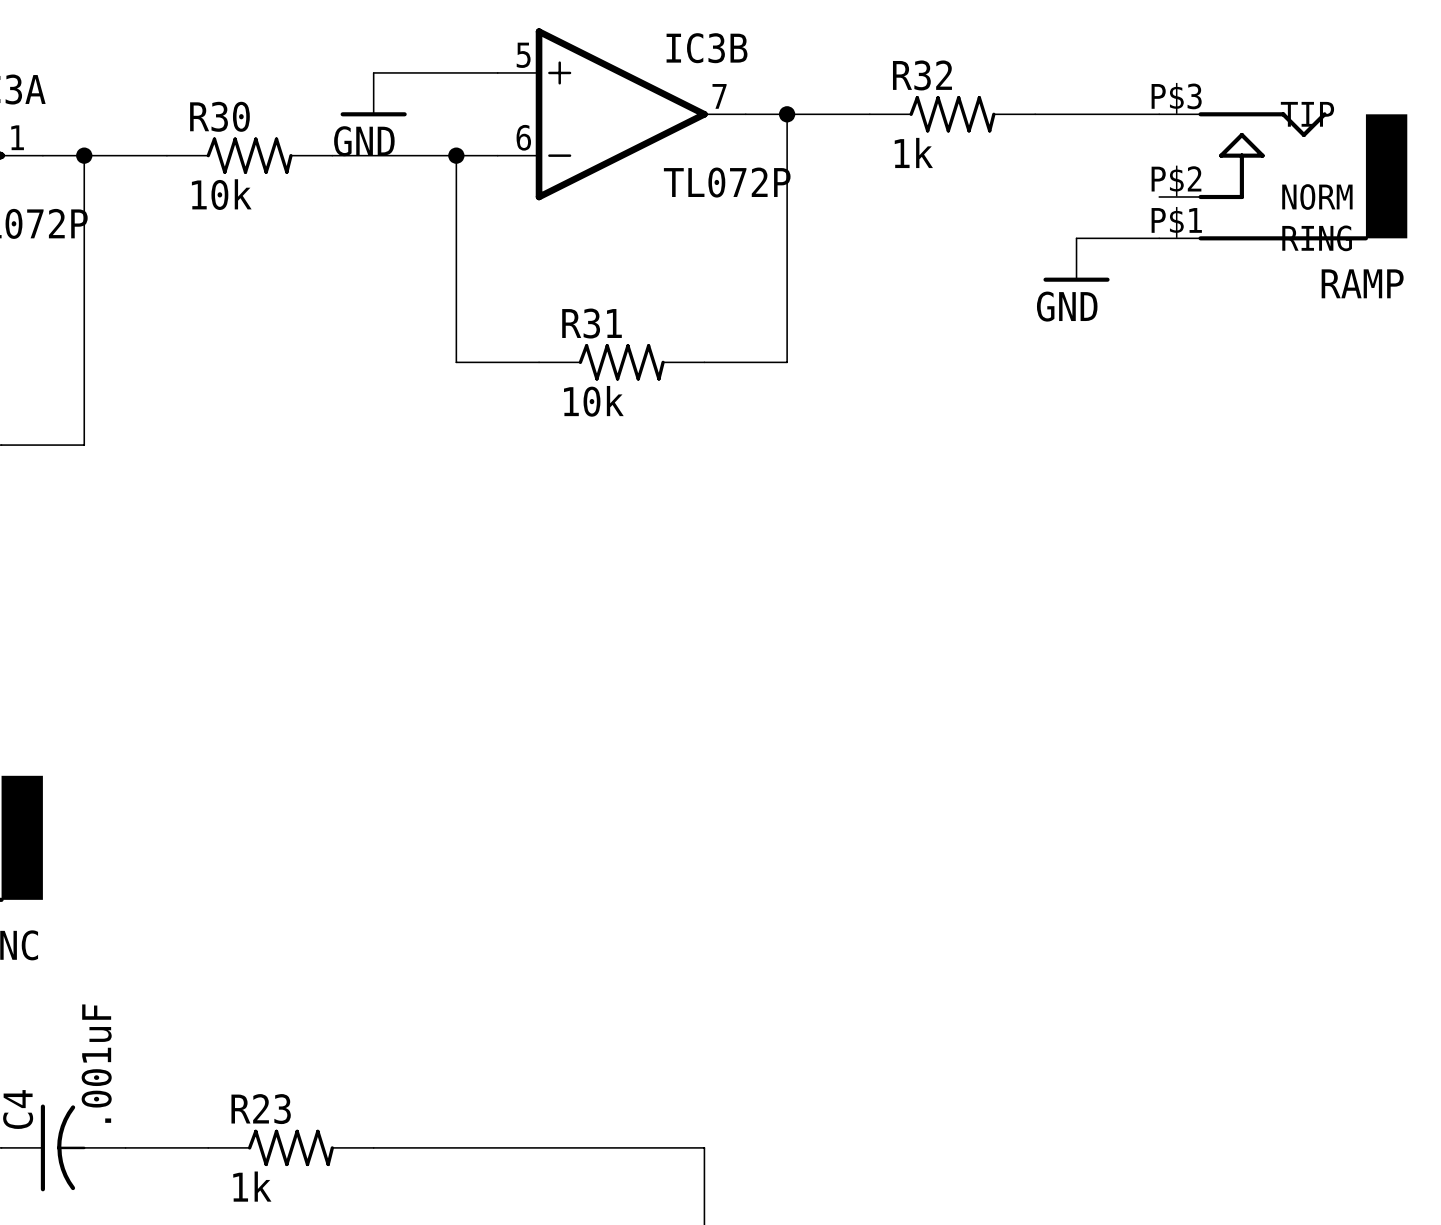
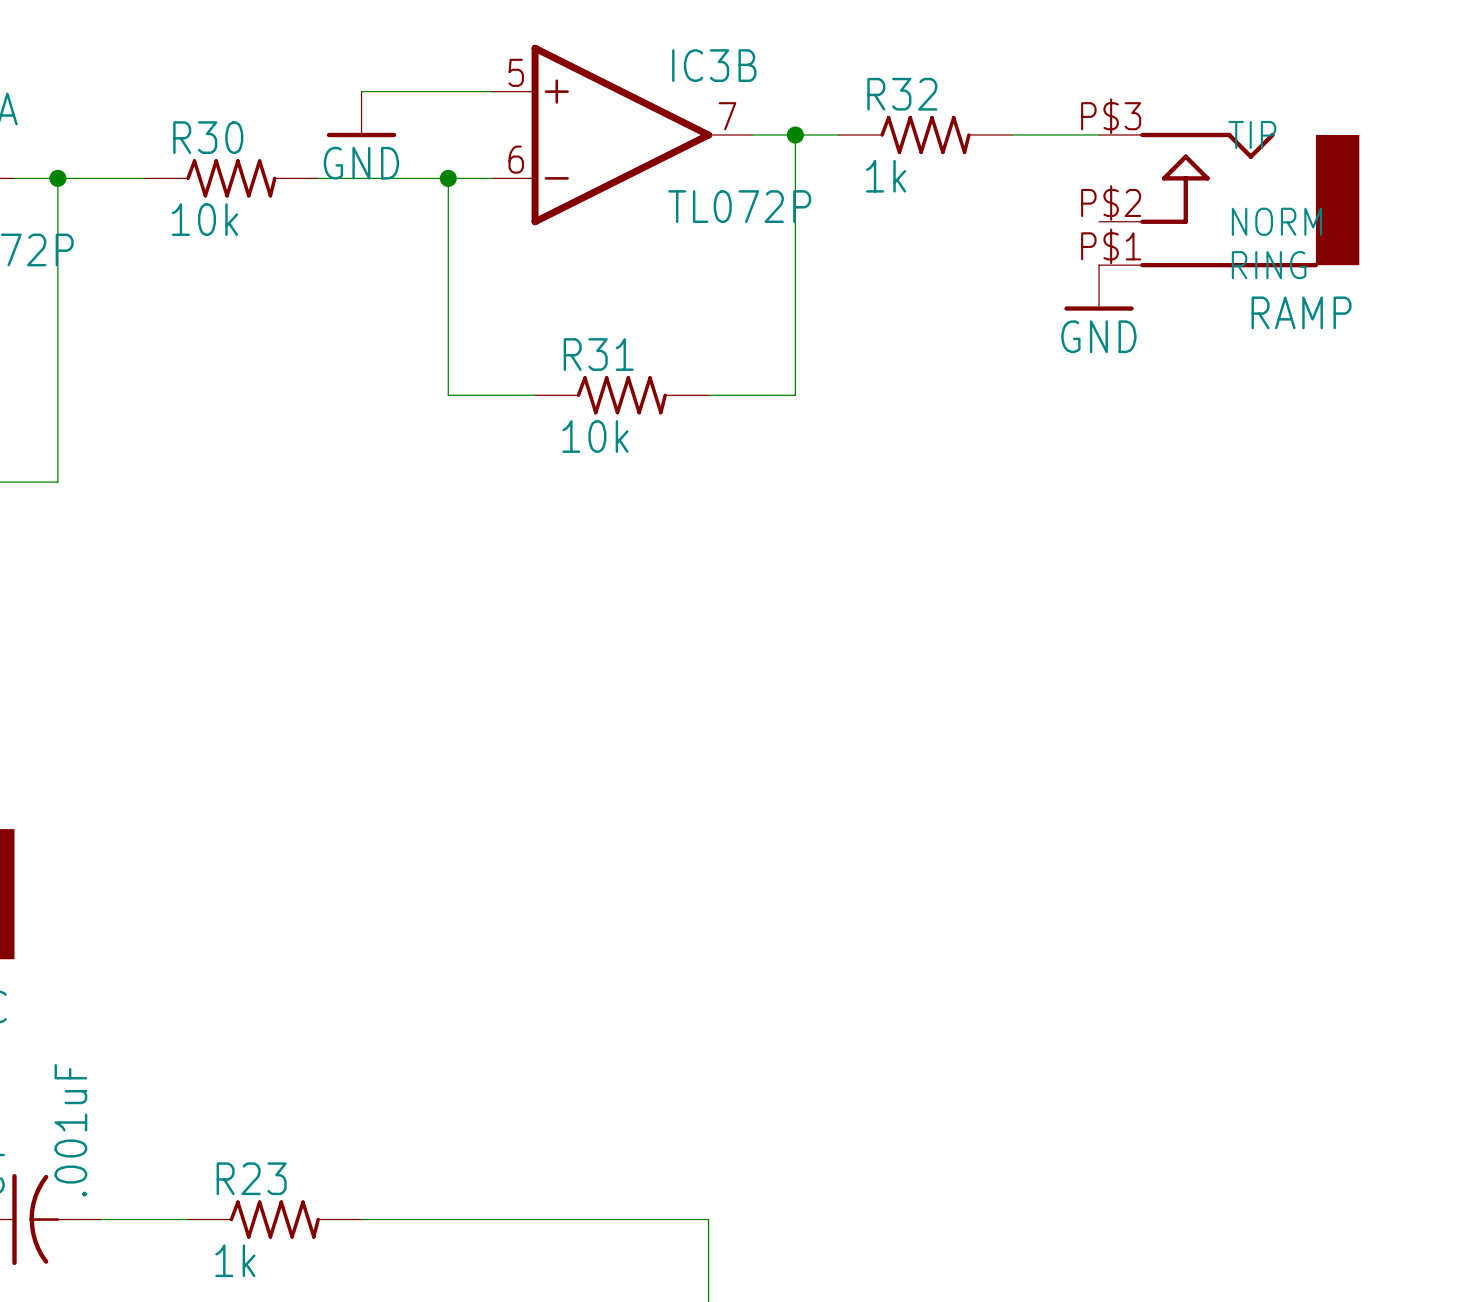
R32 position: (952, 114) -> (925, 135)
RAMP position: (1283, 176) -> (1229, 200)

